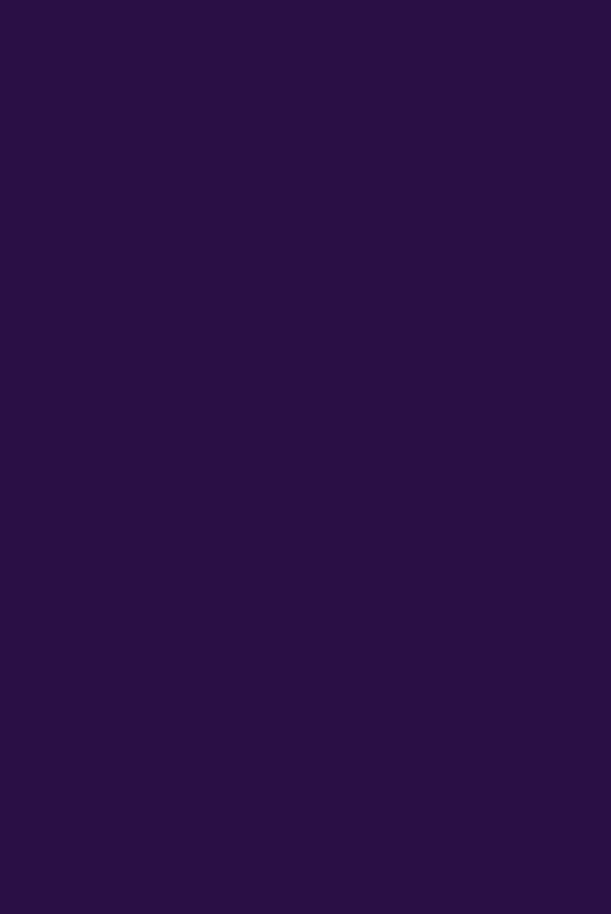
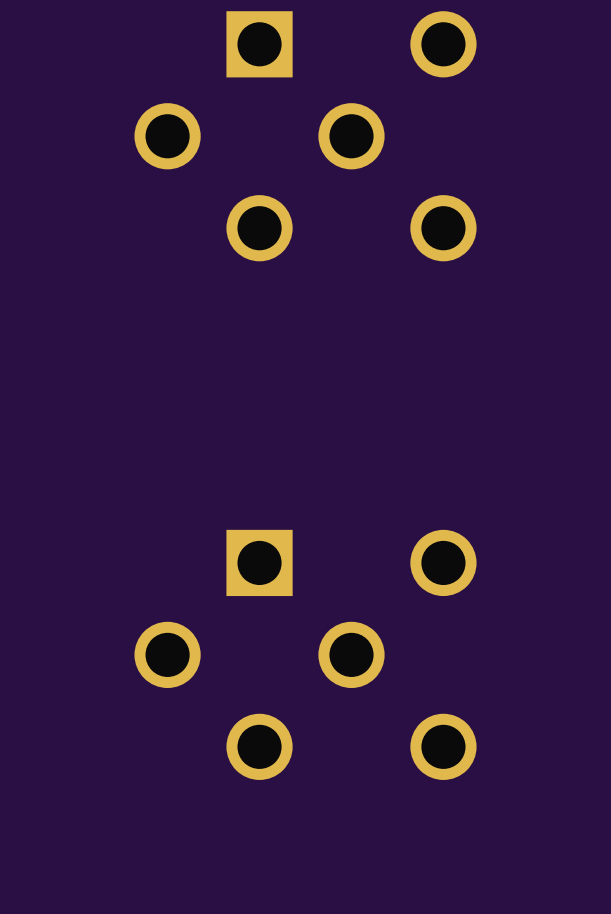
part: none -> (305, 136)
part: none -> (305, 654)

